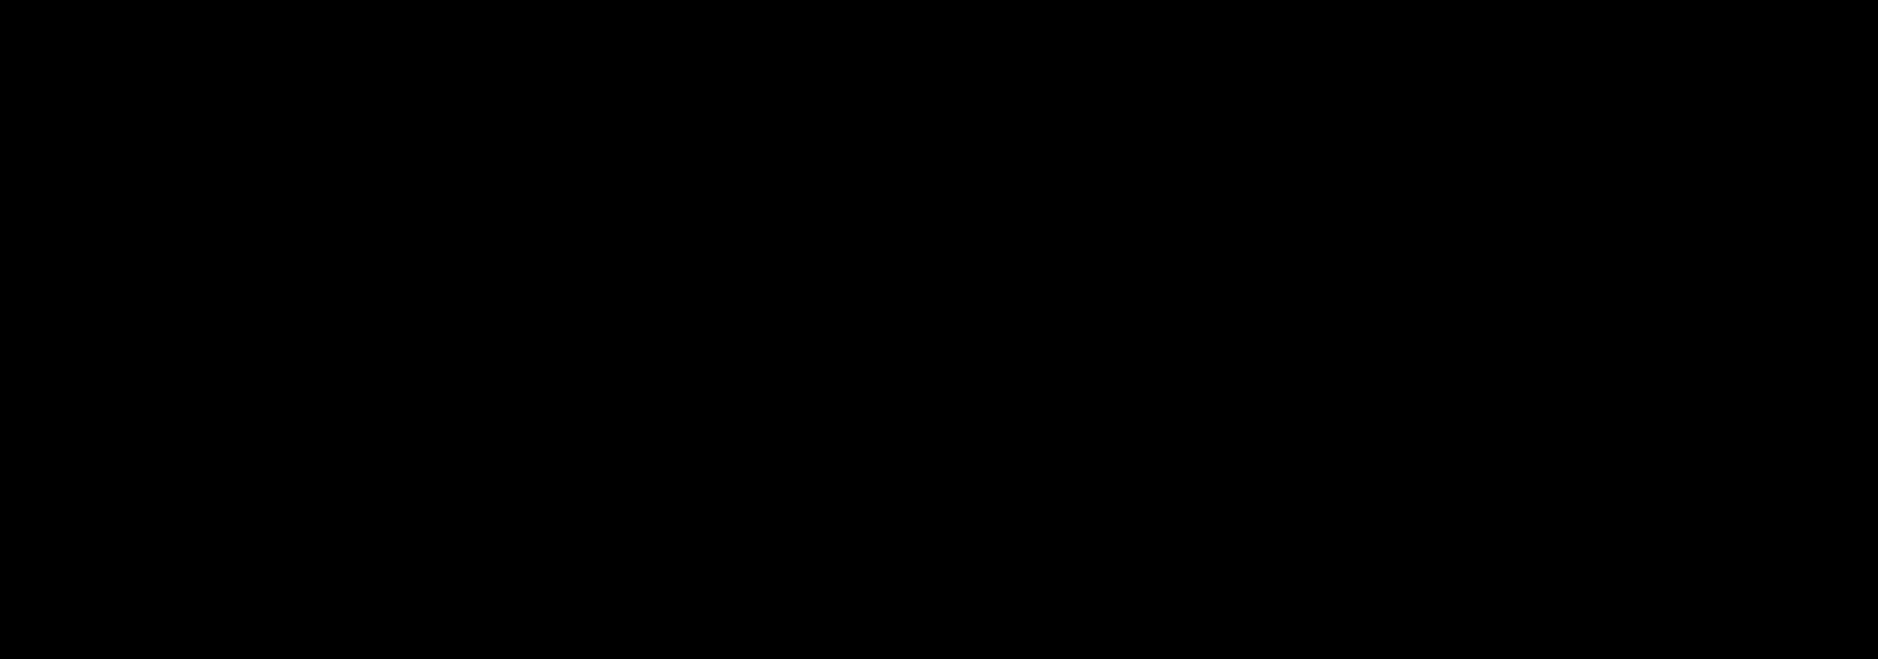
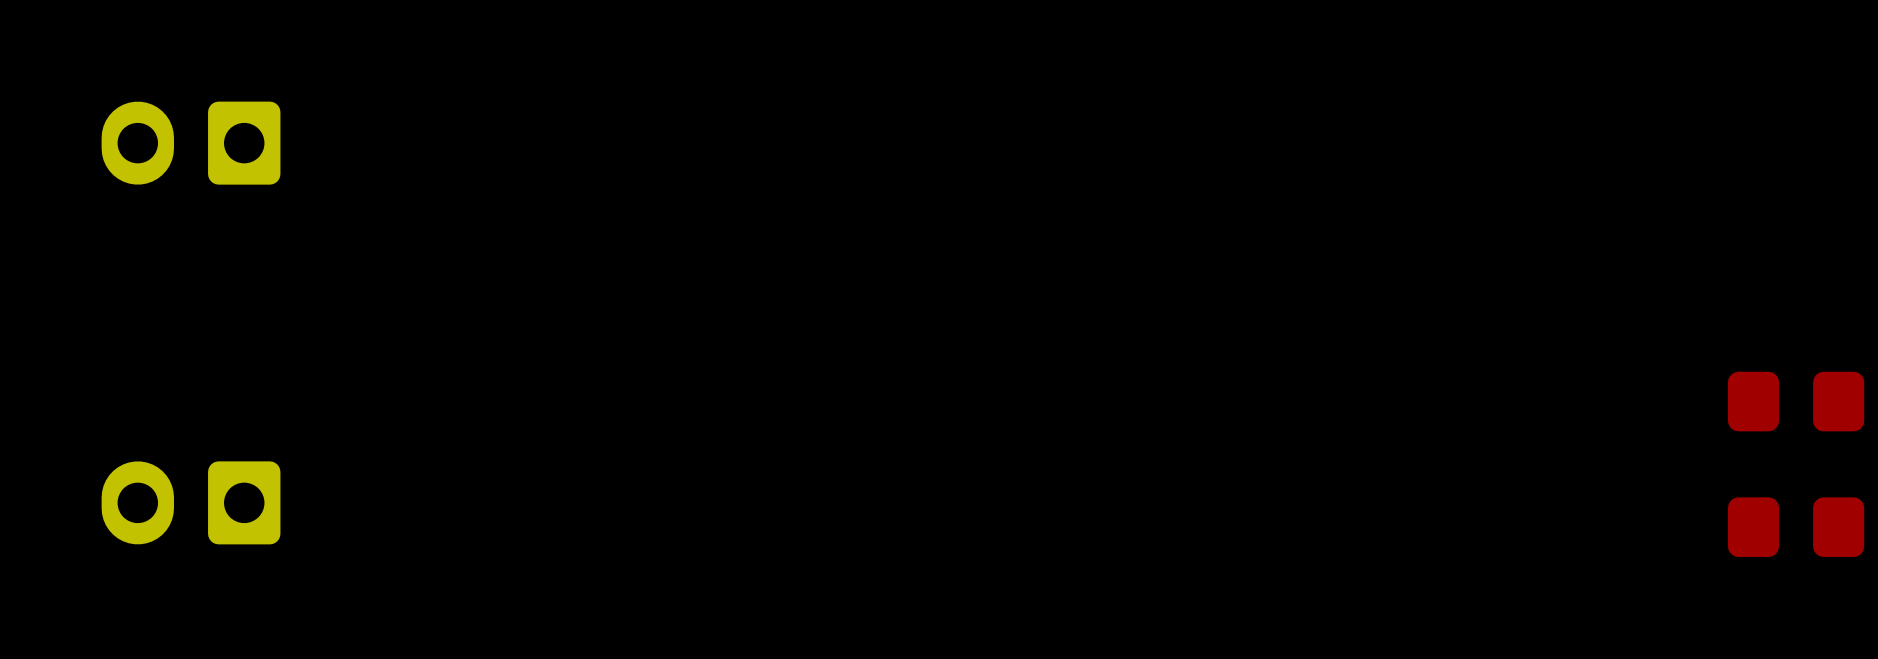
part: none -> (191, 143)
part: none -> (1796, 401)
part: none -> (191, 502)
part: none -> (1796, 527)

